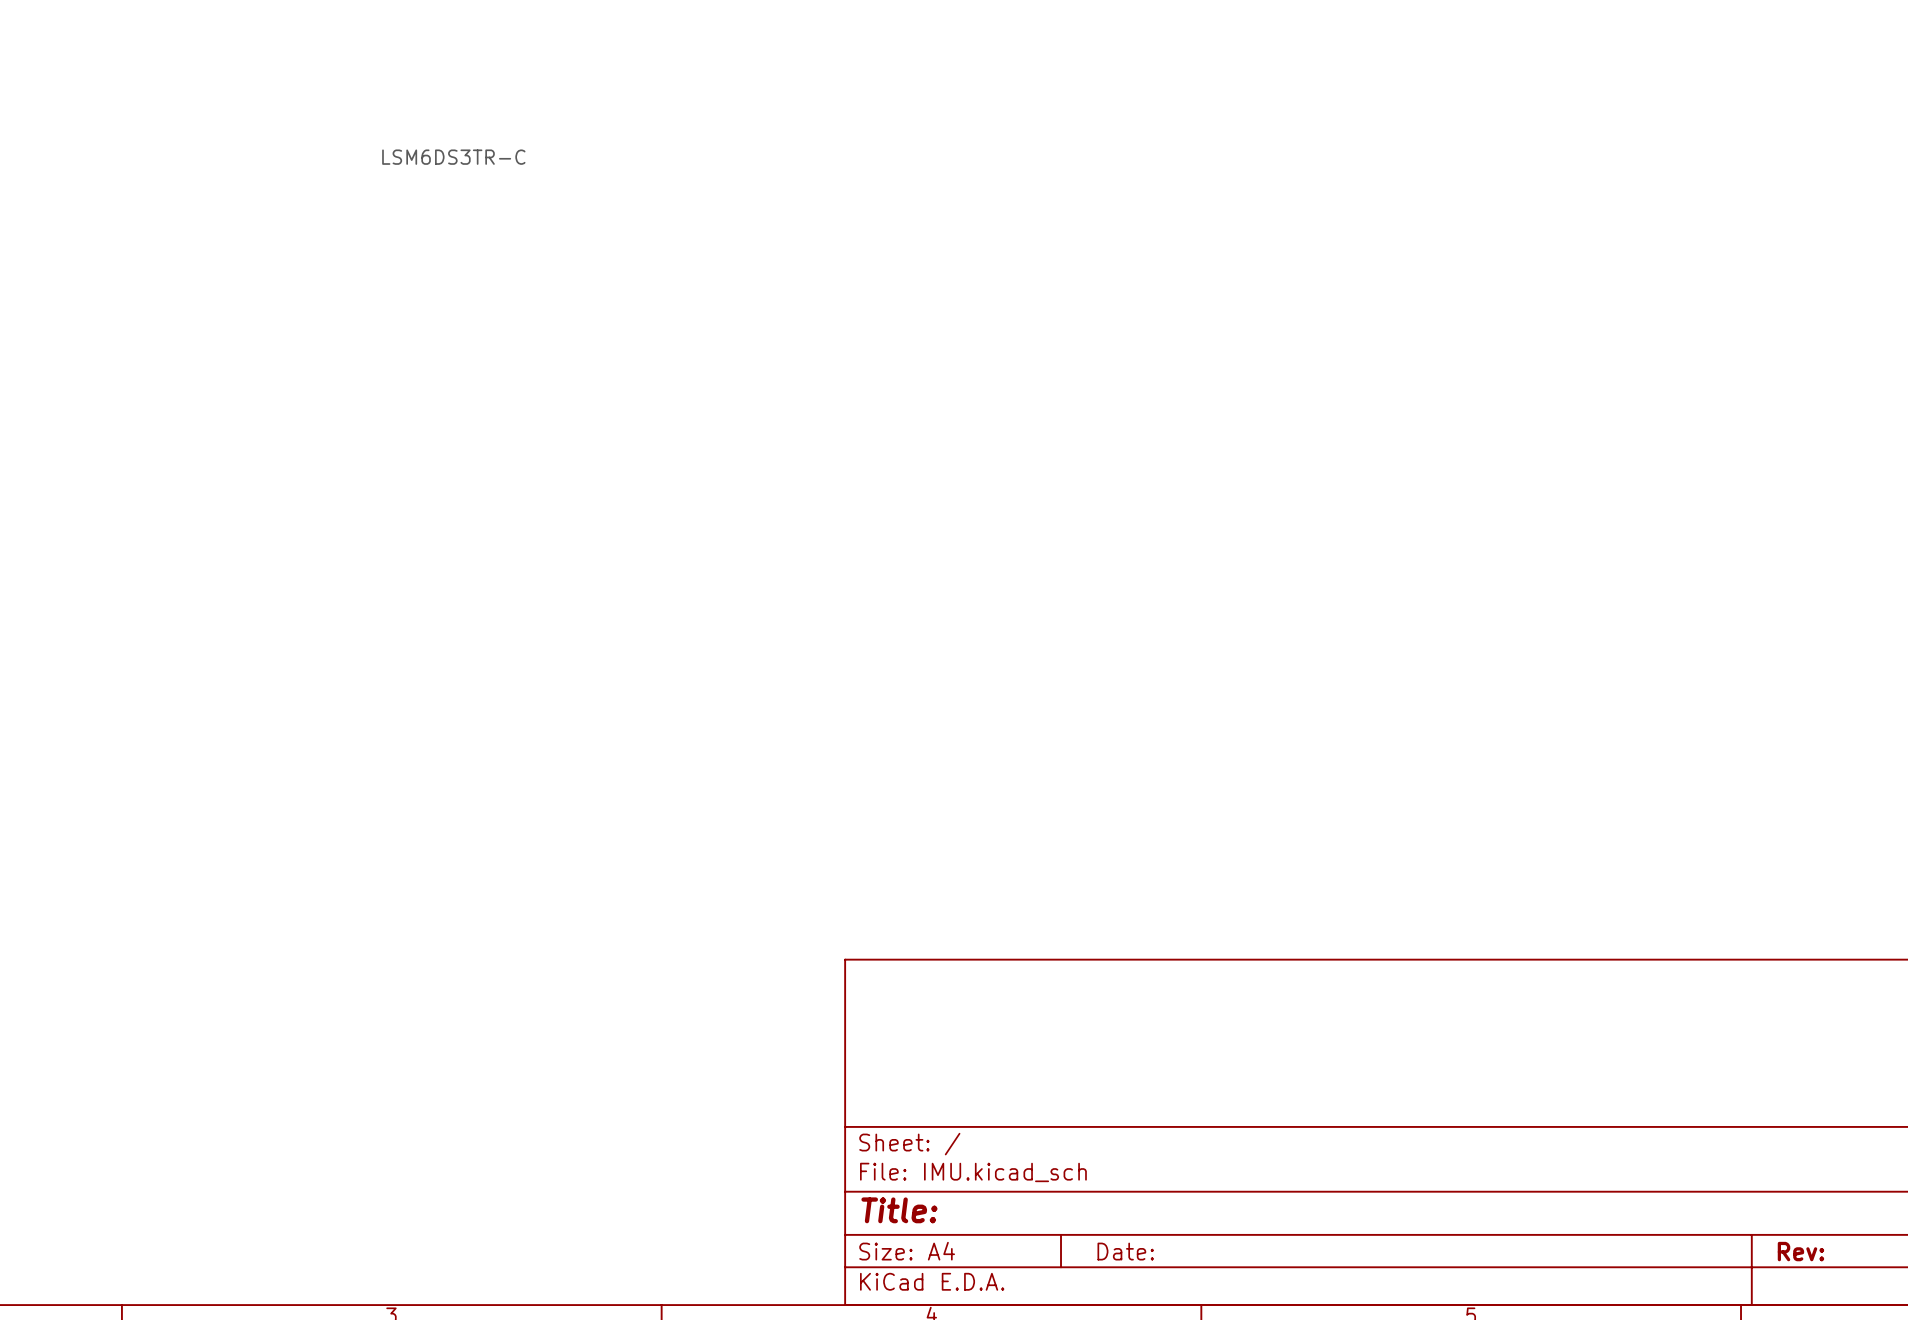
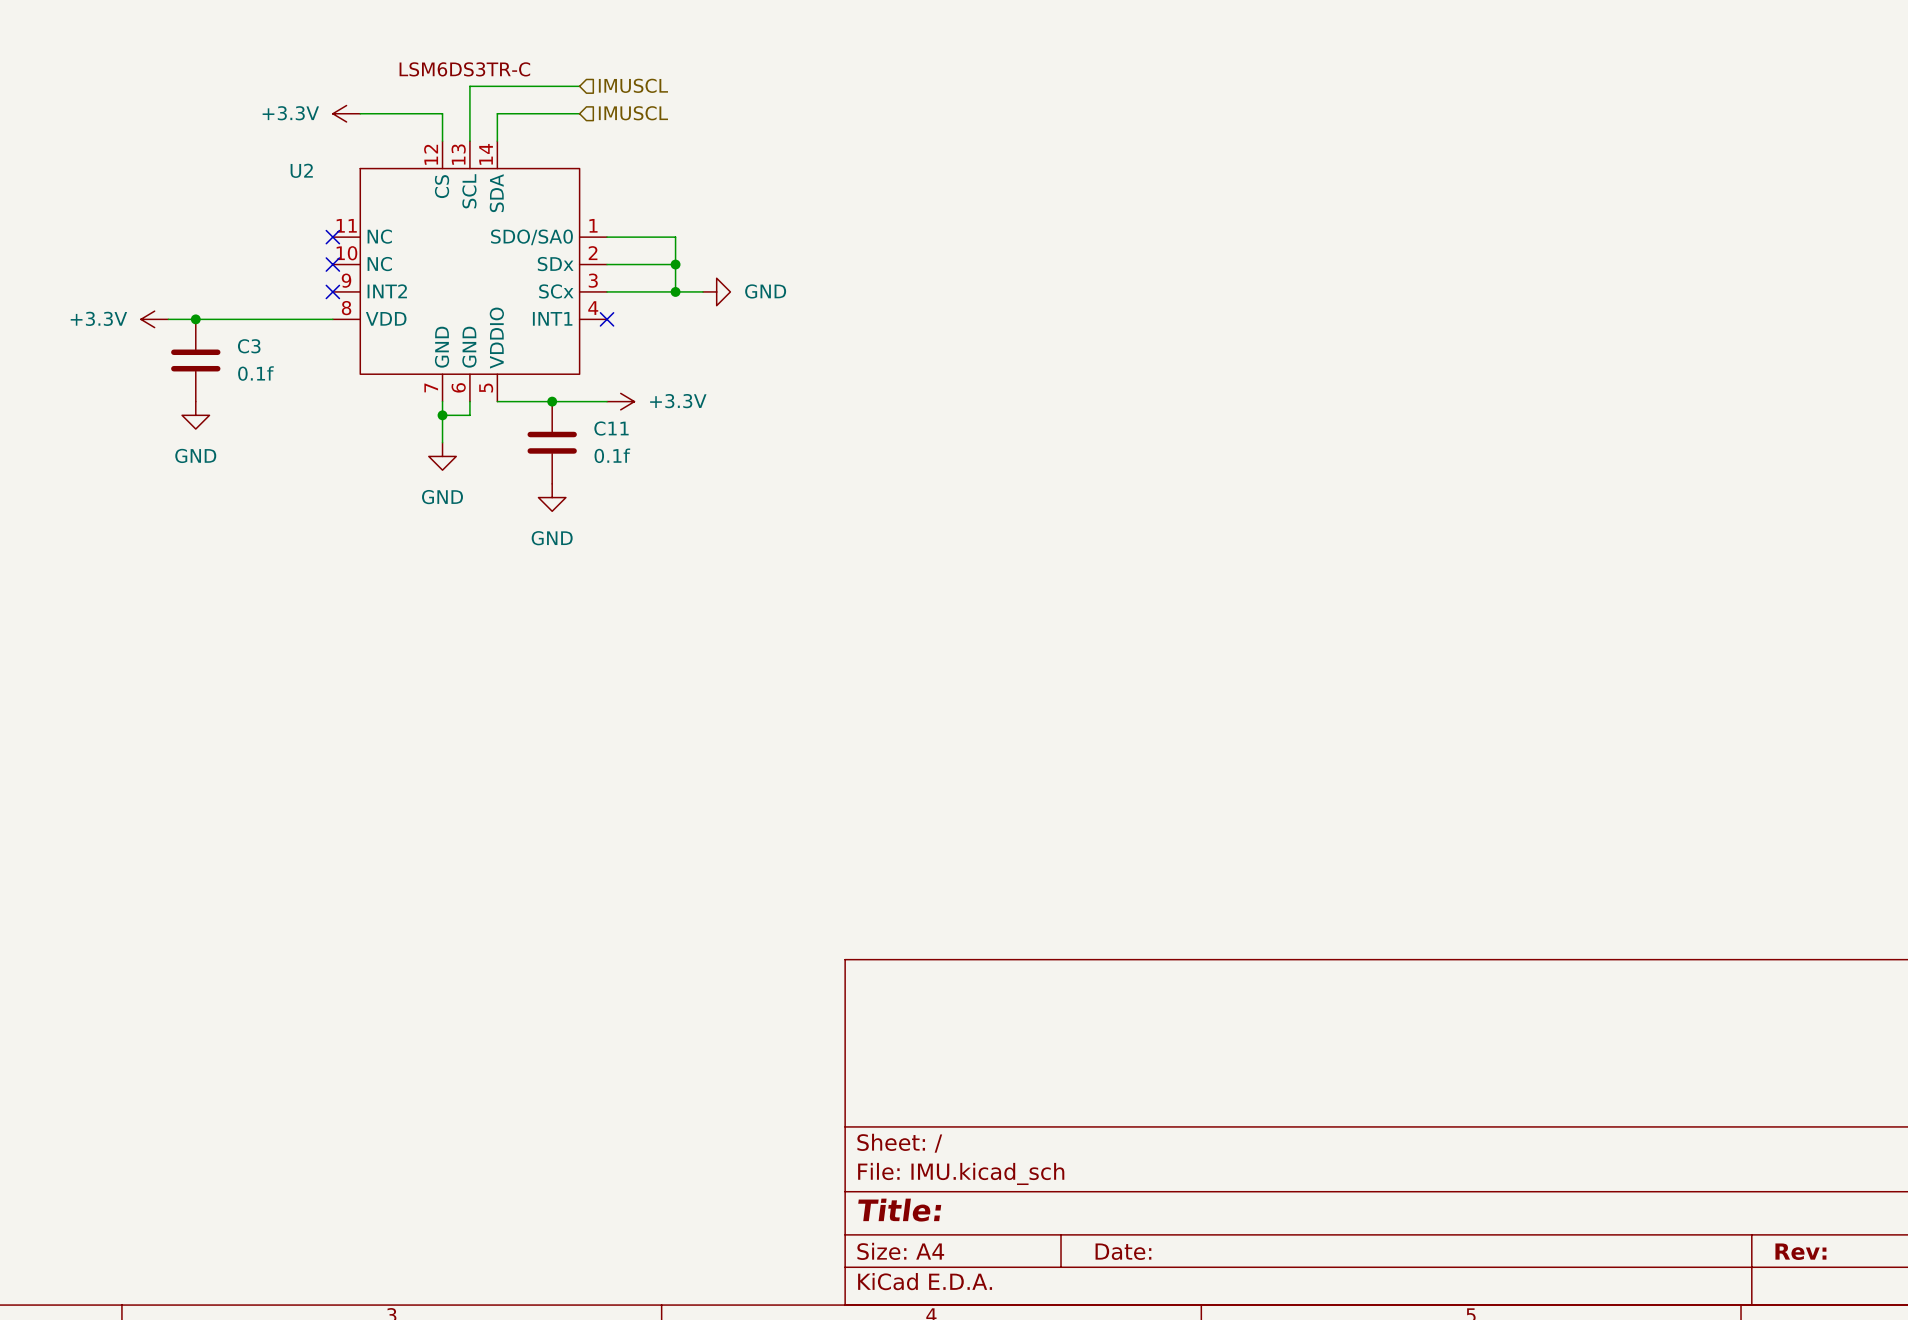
hierarchical label: none -> IMUSCL (633, 85)
wire: none -> (579, 86) (469, 86) (469, 141)
power symbol: none -> +3.3V (346, 113)
wire: none -> (360, 113) (442, 113) (442, 141)
wire: none -> (579, 113) (497, 113) (497, 141)
hierarchical label: none -> IMUSCL (633, 113)
text: LSM6DS3TR-C (453, 157) -> none
no-connect mark: none -> (332, 237)
wire: none -> (607, 237) (675, 237) (675, 291)
no-connect mark: none -> (332, 264)
wire: none -> (607, 264) (675, 264)
junction: none -> (675, 264)
U2: none -> (469, 271)
no-connect mark: none -> (332, 291)
wire: none -> (607, 291) (702, 291)
junction: none -> (675, 291)
power symbol: none -> GND (716, 291)
power symbol: none -> +3.3V (154, 319)
wire: none -> (168, 319) (332, 319)
junction: none -> (195, 319)
no-connect mark: none -> (607, 319)
C3: none -> 0.1f (195, 360)
wire: none -> (442, 401) (442, 442)
wire: none -> (469, 401) (469, 415) (442, 415)
wire: none -> (497, 401) (607, 401)
junction: none -> (552, 401)
power symbol: none -> +3.3V (620, 401)
power symbol: none -> GND (195, 415)
junction: none -> (442, 415)
C11: none -> 0.1f (552, 442)
power symbol: none -> GND (442, 456)
power symbol: none -> GND (552, 497)

